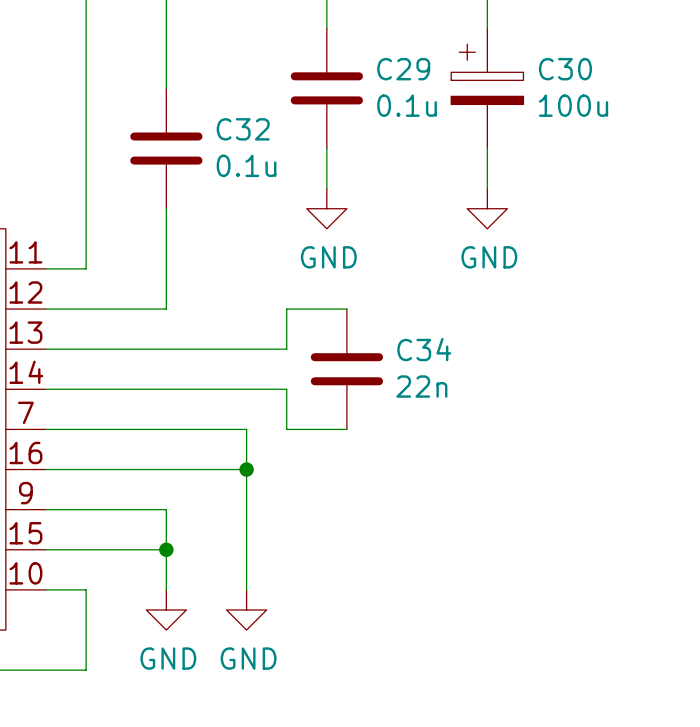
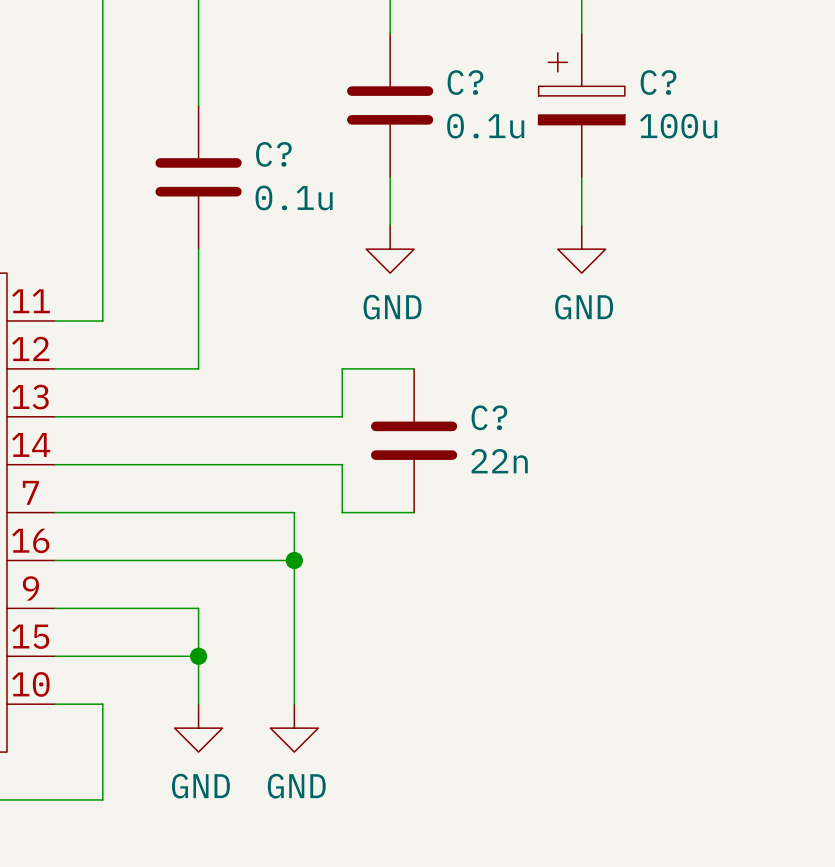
C29 name: C29 (403, 69) -> C? (465, 82)
C30 name: C30 (565, 69) -> C? (658, 82)
C32 name: C32 (243, 129) -> C? (273, 154)
C34 name: C34 (424, 349) -> C? (489, 417)

